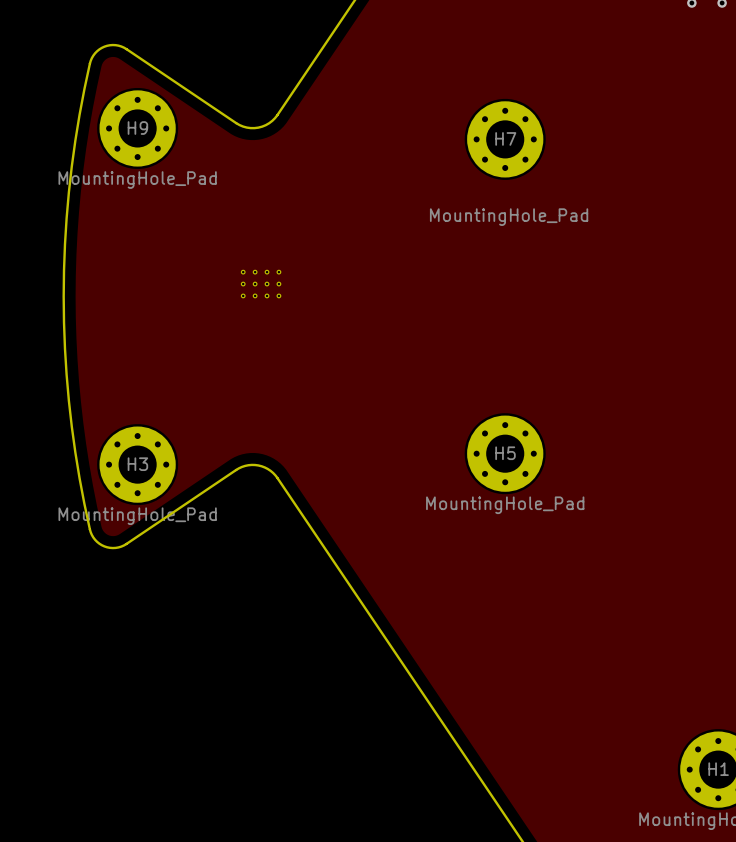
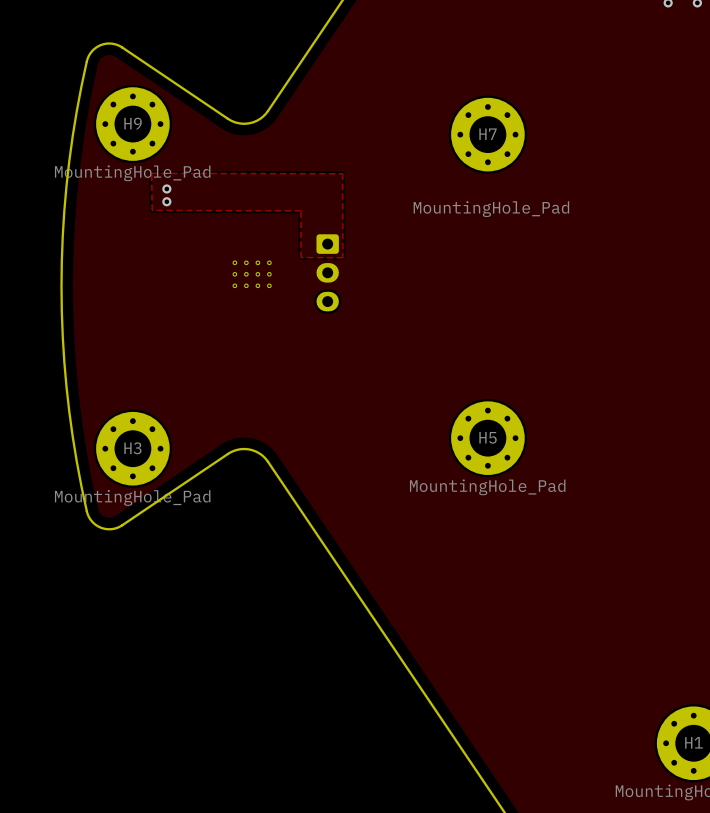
zone outline: none -> (151, 173) (342, 173) (342, 257) (300, 257) (300, 210) (152, 210) (151, 173)
via: none -> (166, 188)
via: none -> (166, 201)
part: none -> (327, 272)

